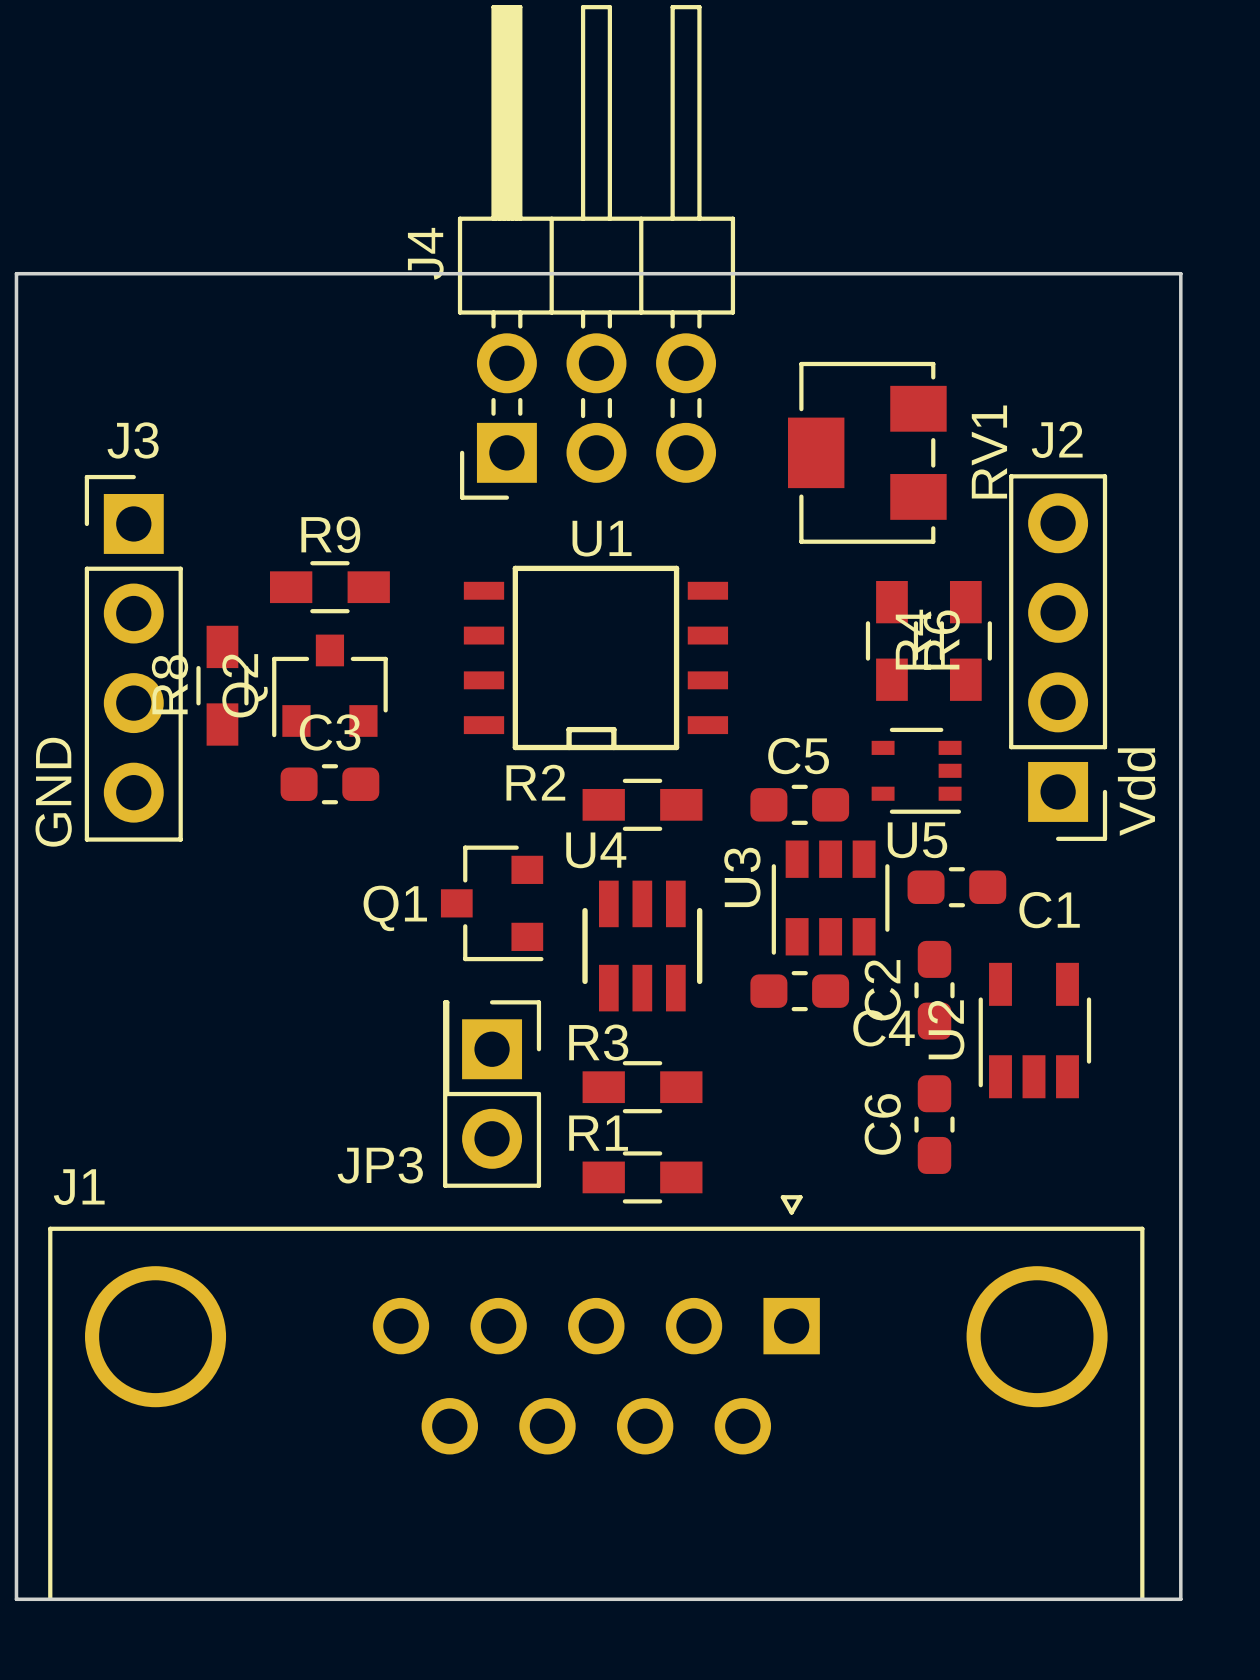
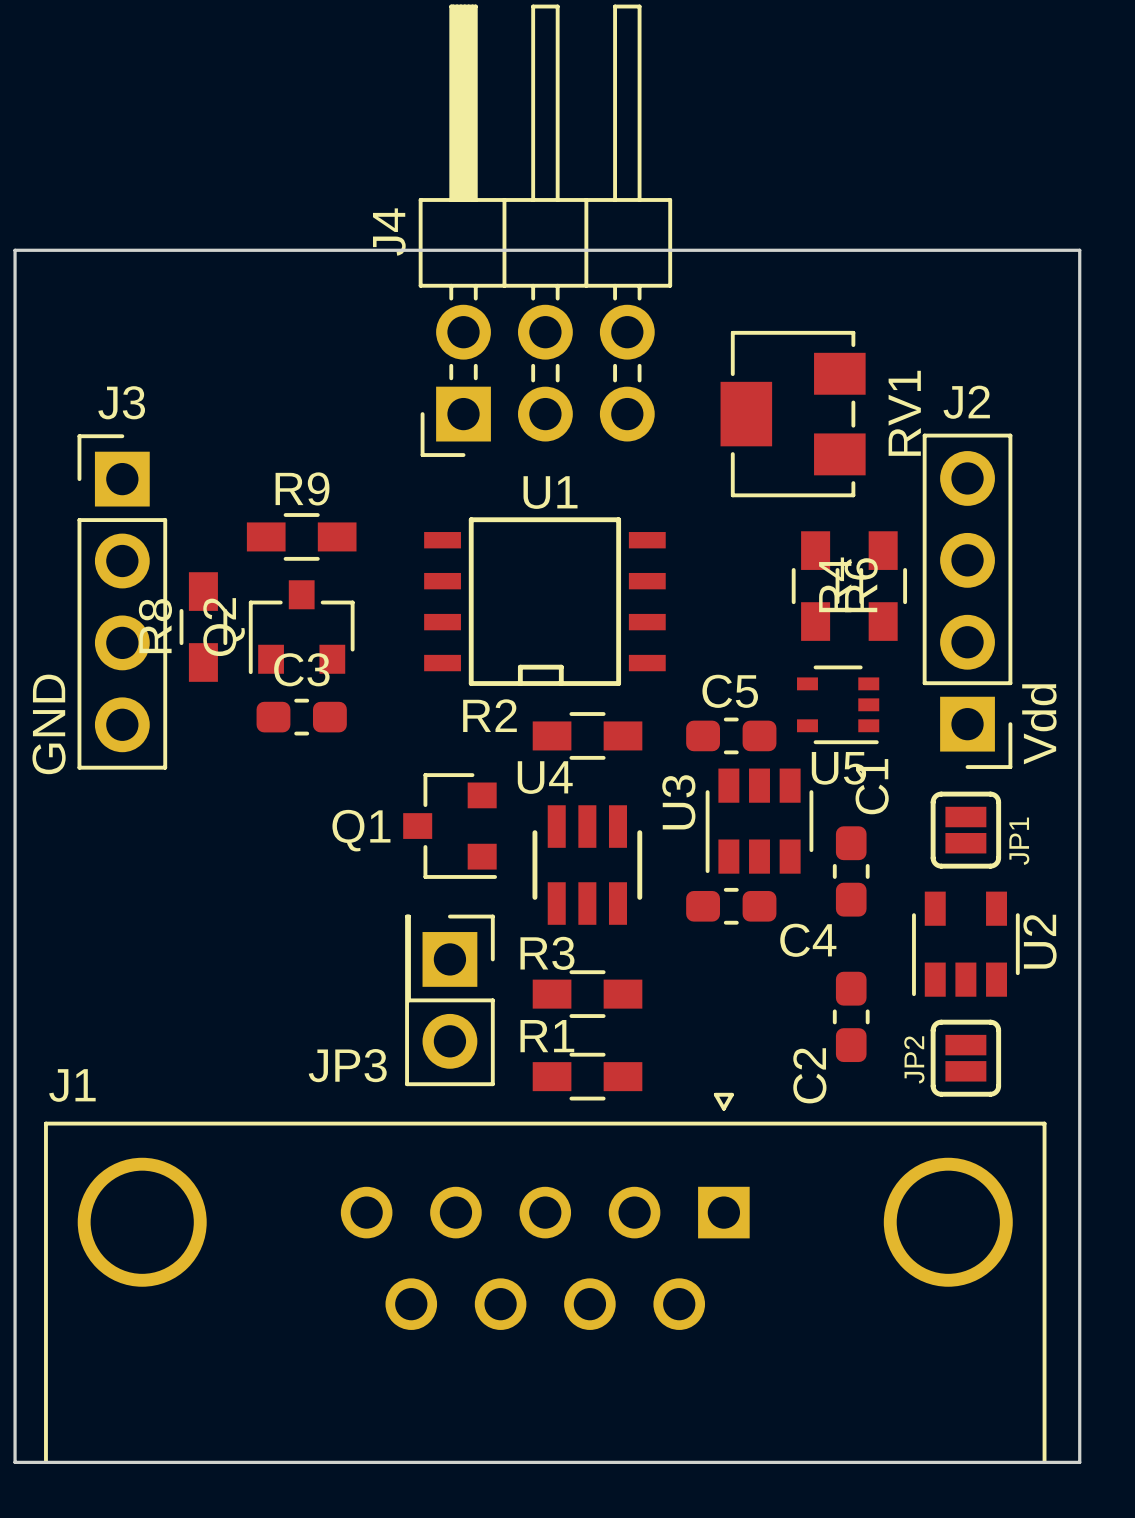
C1 rotation: 0° (956, 887) -> 90° clockwise (851, 871)
C1 position: (956, 887) -> (851, 871)
JP1: none -> (965, 830)
C1 name position: C1 (1049, 910) -> C1 (872, 786)
U2 footprint: [978, 962, 1092, 1099] -> [912, 891, 1020, 997]
C2 name position: C2 (882, 990) -> C2 (809, 1075)
C2 position: (934, 990) -> (851, 1016)
U2 name position: U2 (946, 1029) -> U2 (1040, 941)
C6: (934, 1124) -> none
JP2: none -> (965, 1058)

